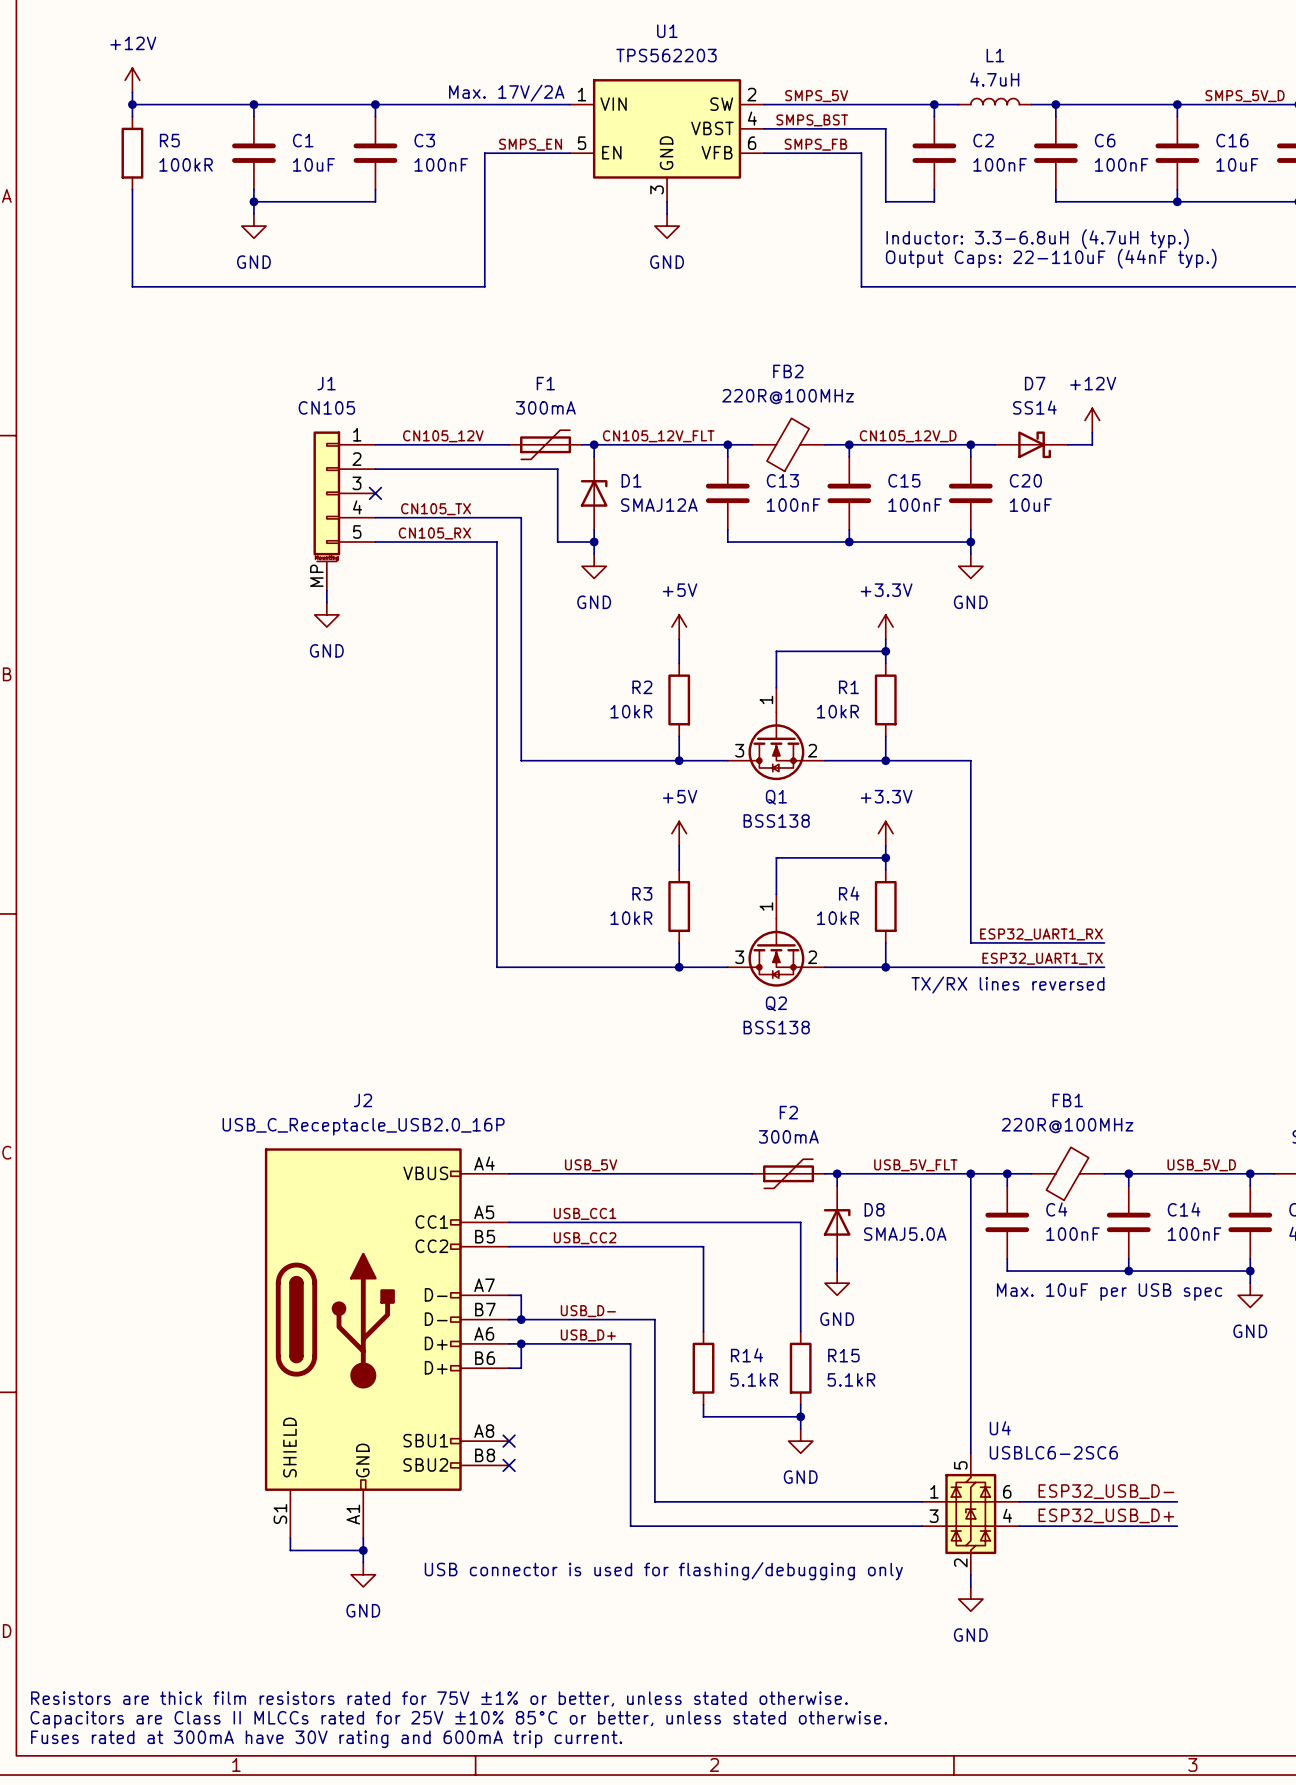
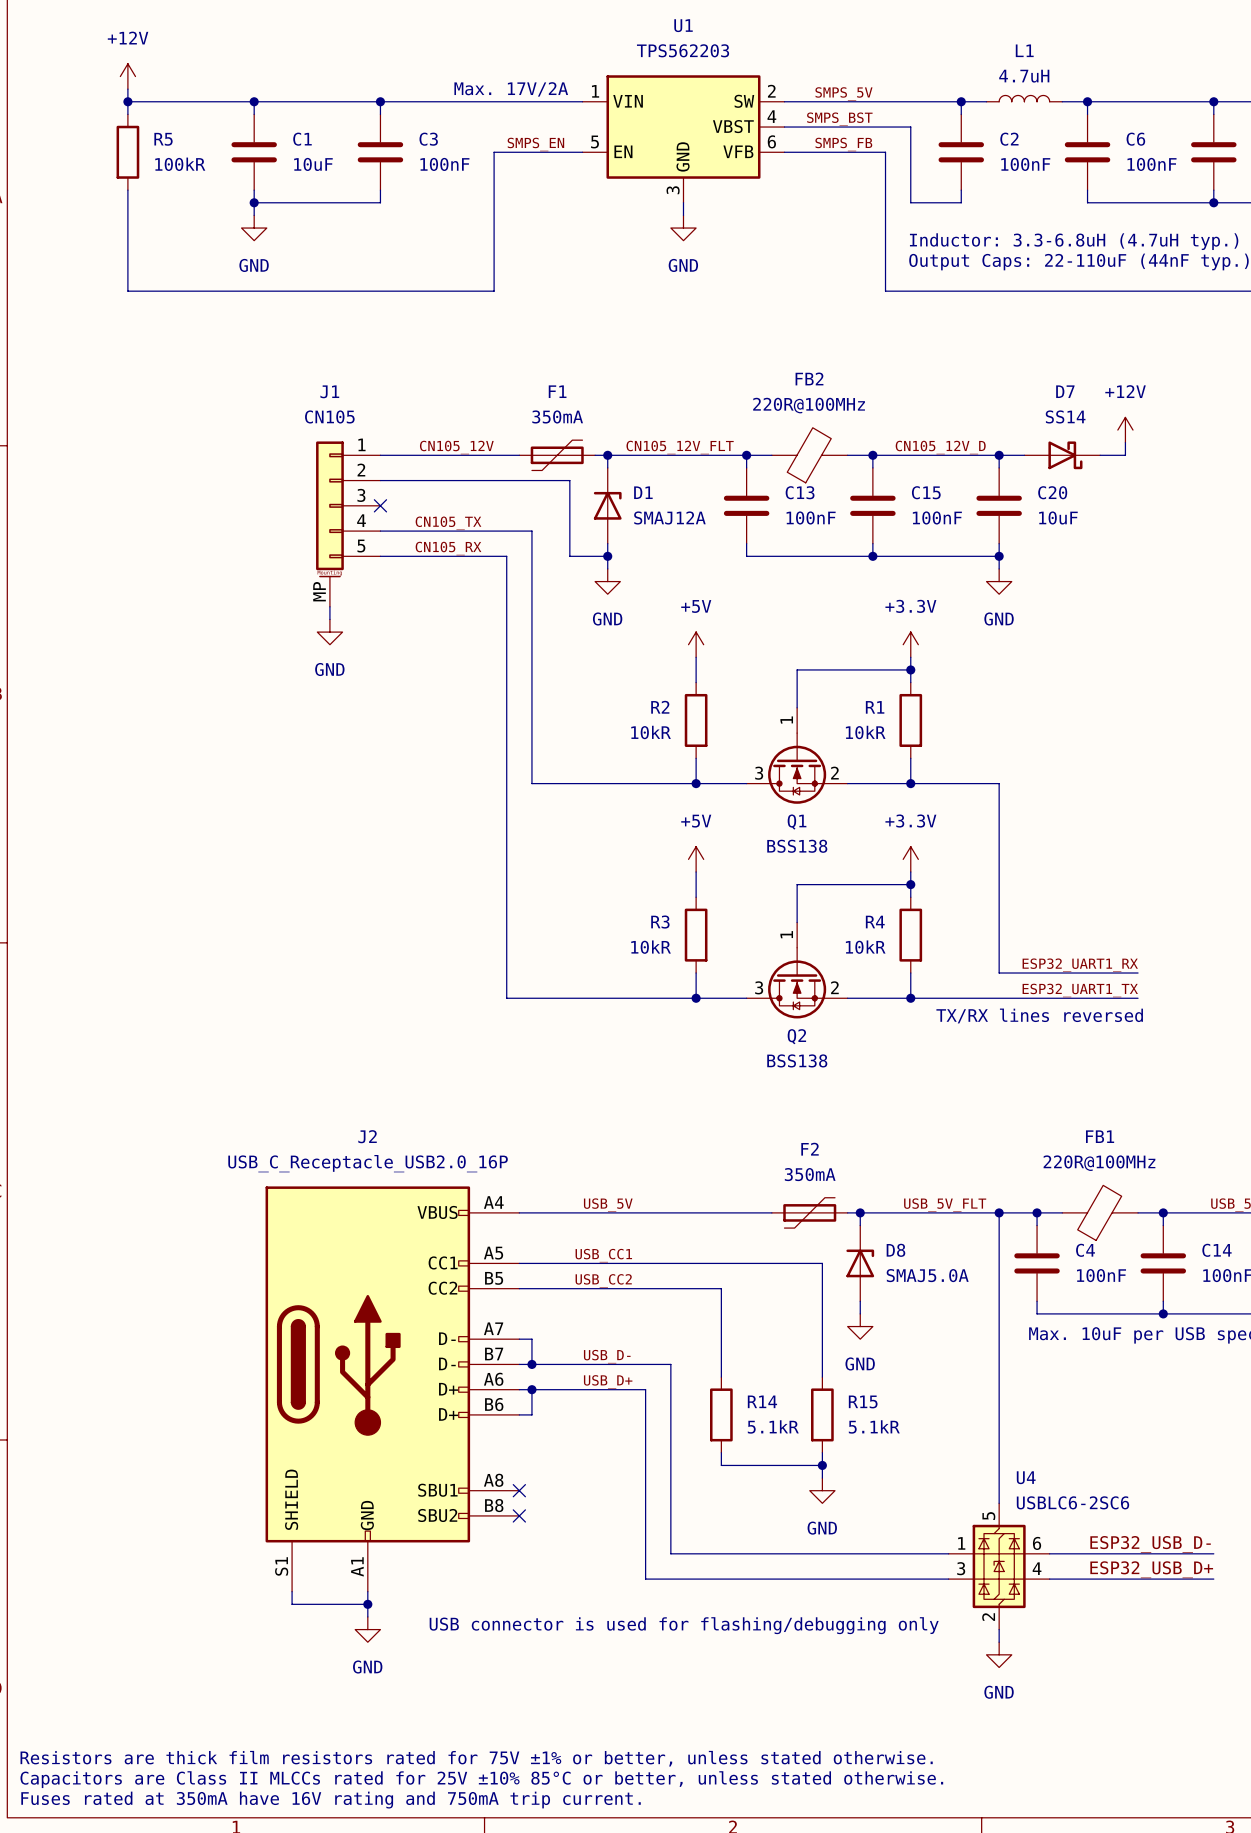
F1 value: 300mA (545, 407) -> 350mA (557, 416)
F2 value: 300mA (788, 1136) -> 350mA (810, 1174)
text: Fuses rated at 300mA have 30V rating and 600mA trip current. (326, 1739) -> Fuses rated at 350mA have 16V rating and 750mA trip current. (331, 1800)

